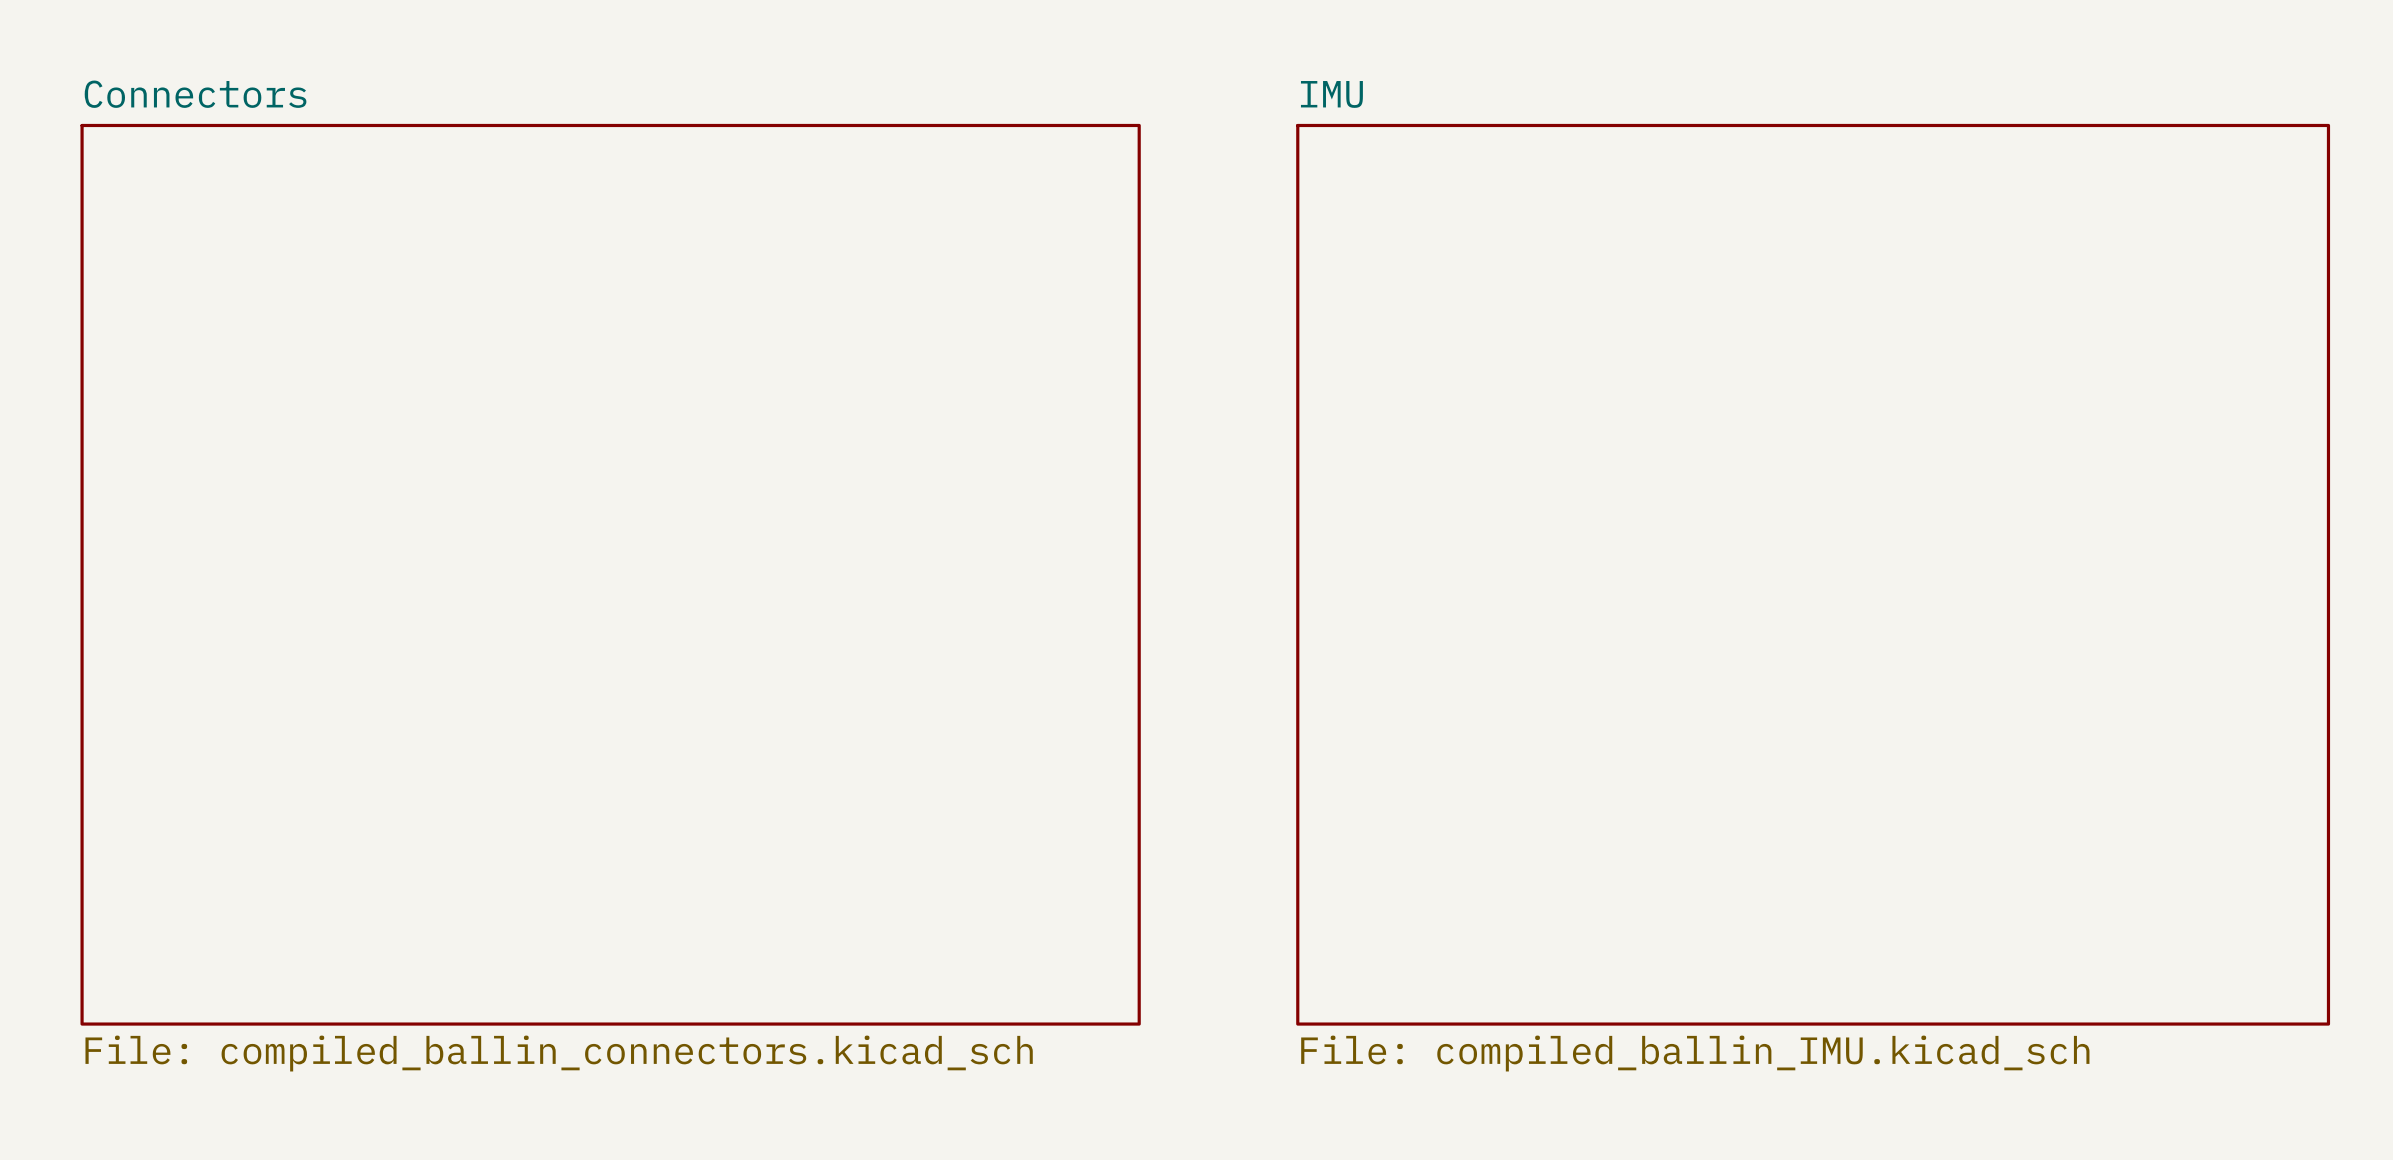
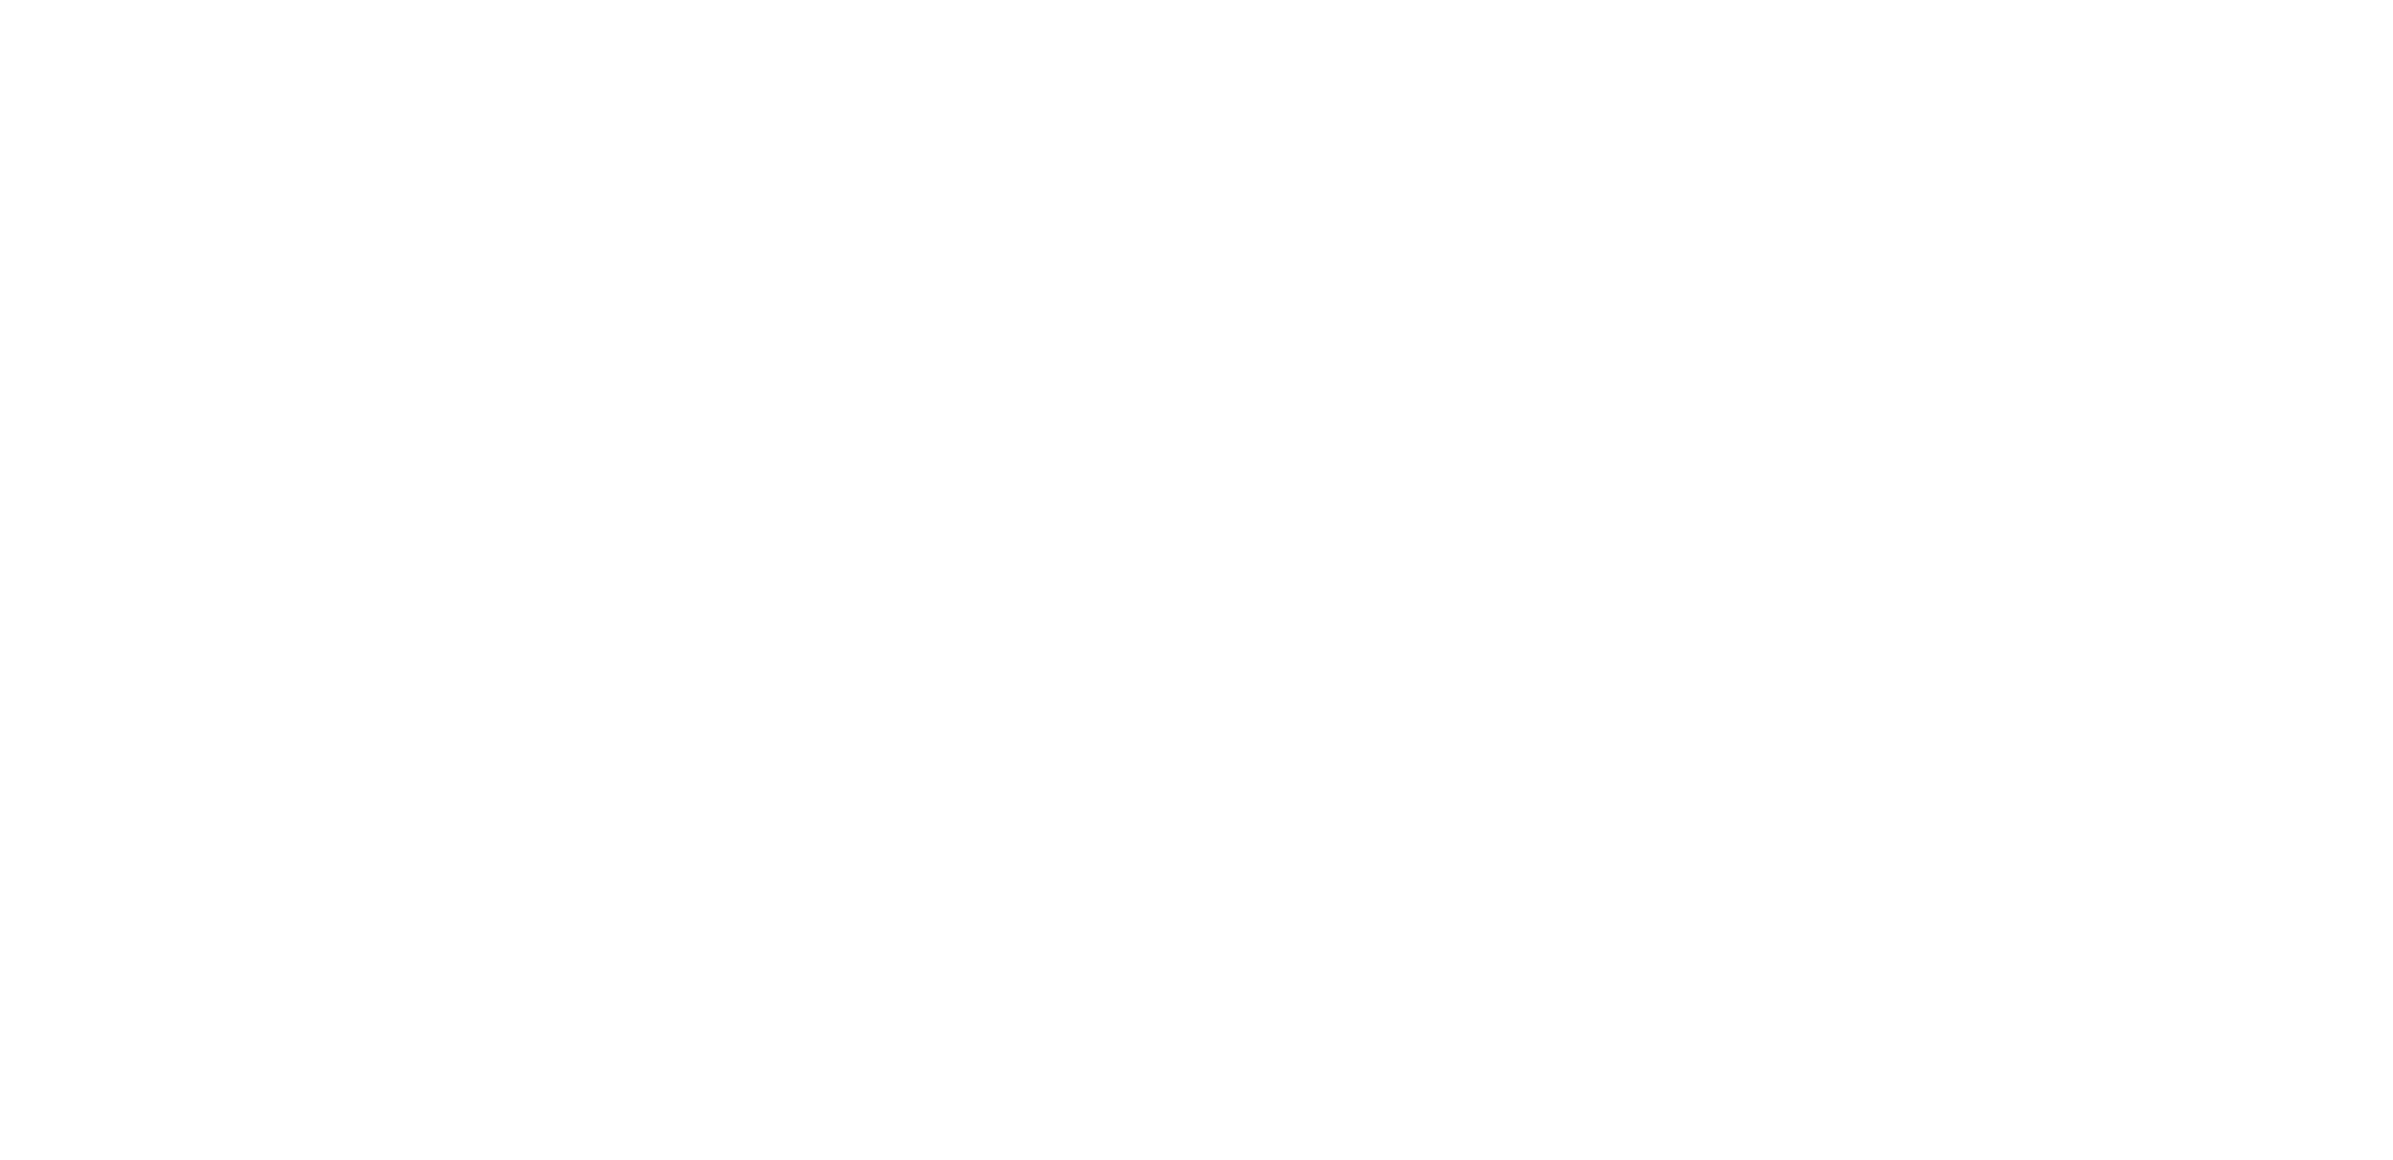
sheet Connectors: File: compiled_ballin_connectors.kicad_sch (610, 574) -> none
sheet IMU: File: compiled_ballin_IMU.kicad_sch (1813, 574) -> none

